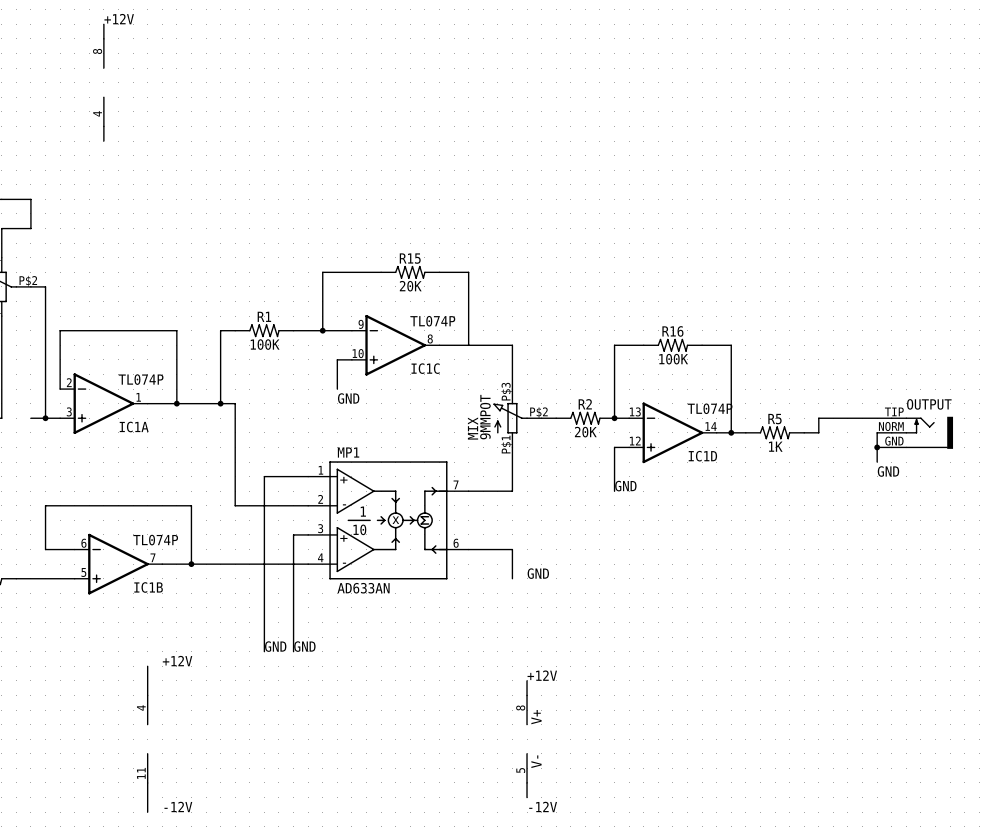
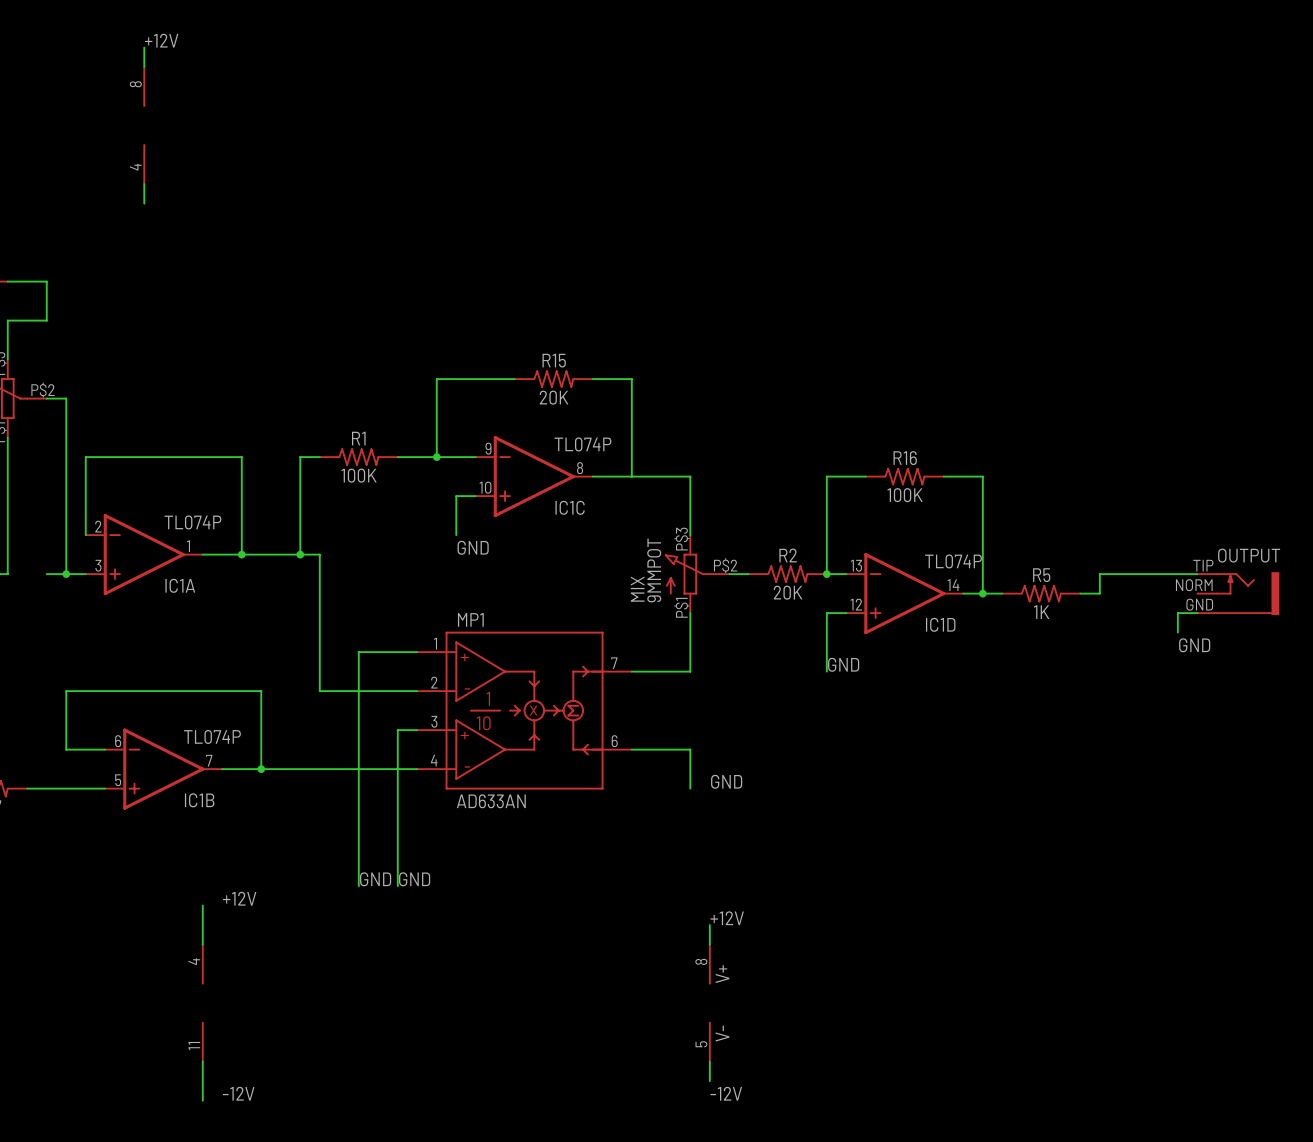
wire: (891, 432) (877, 432) (877, 447) -> none
junction: (877, 447) -> none

